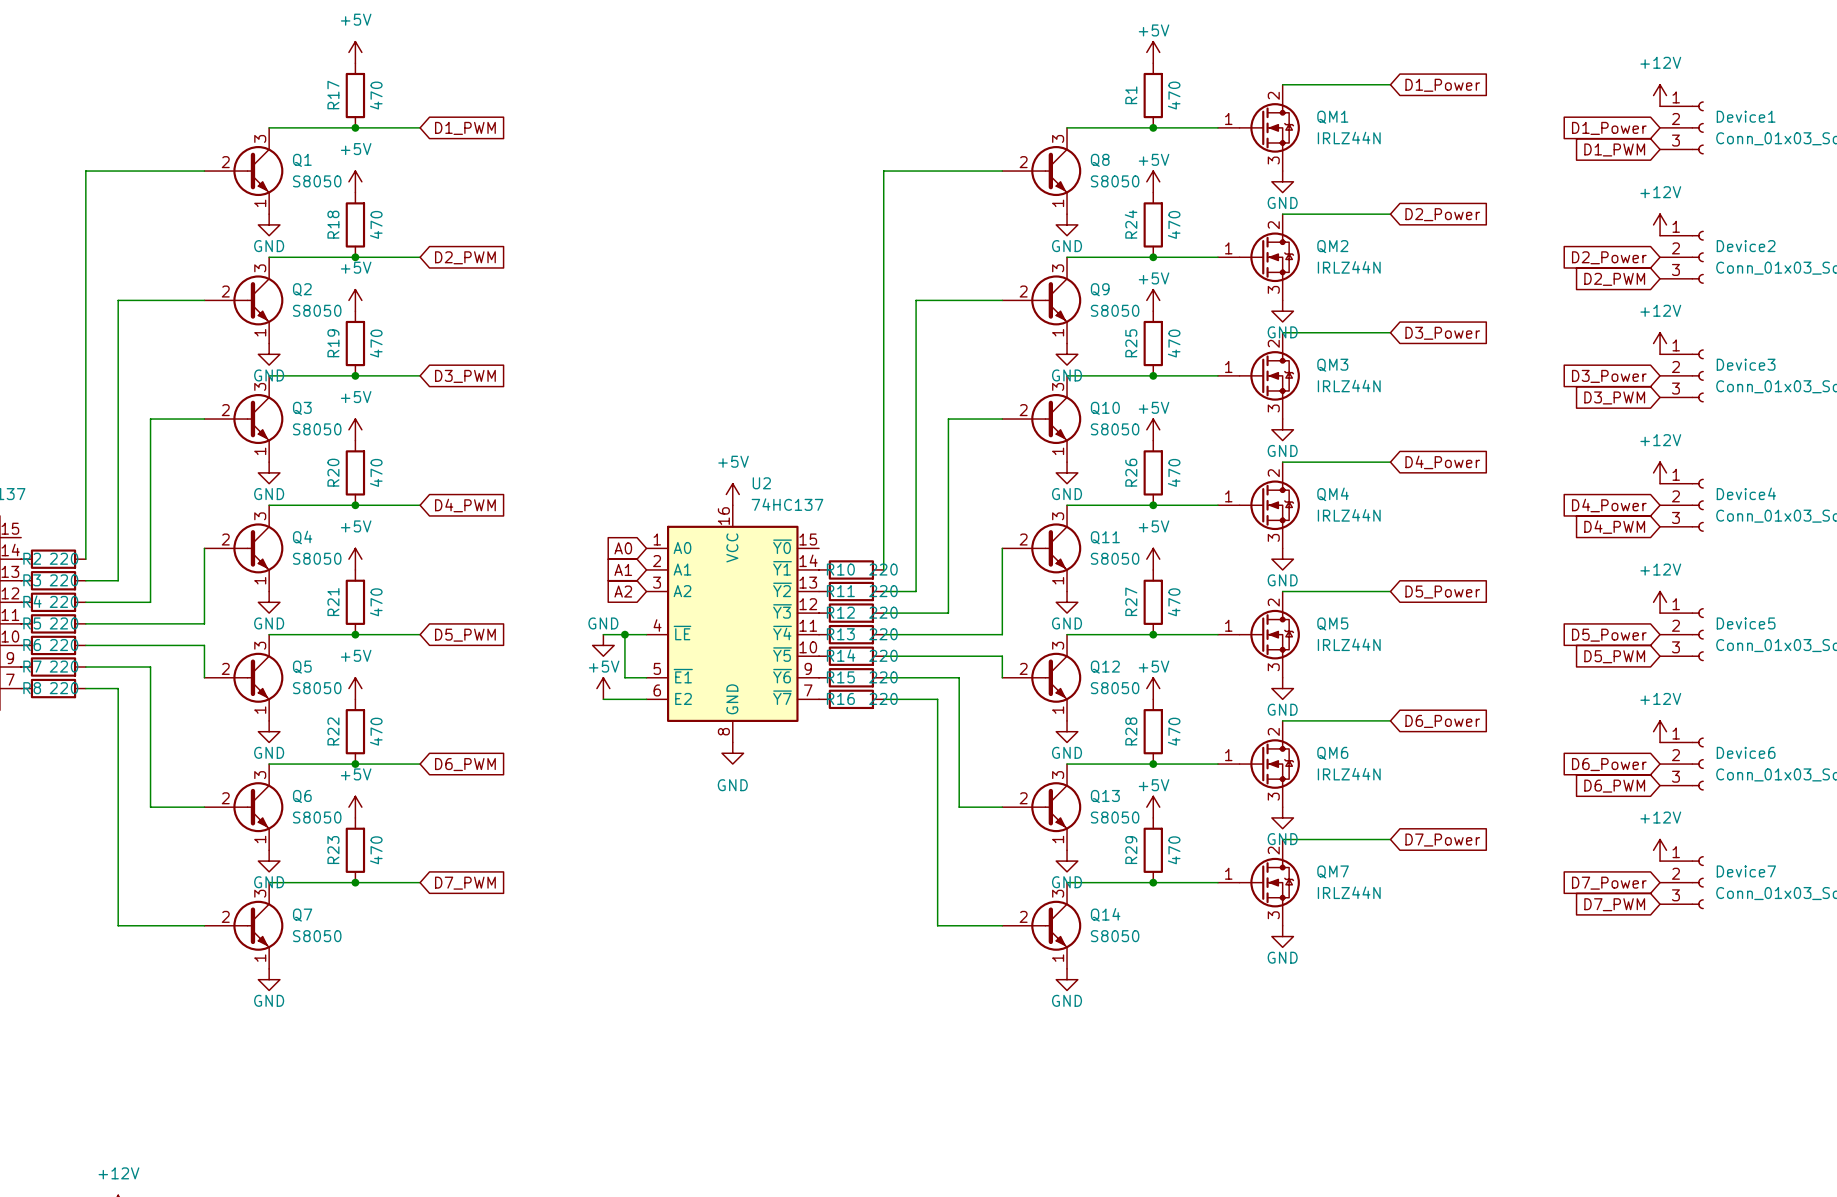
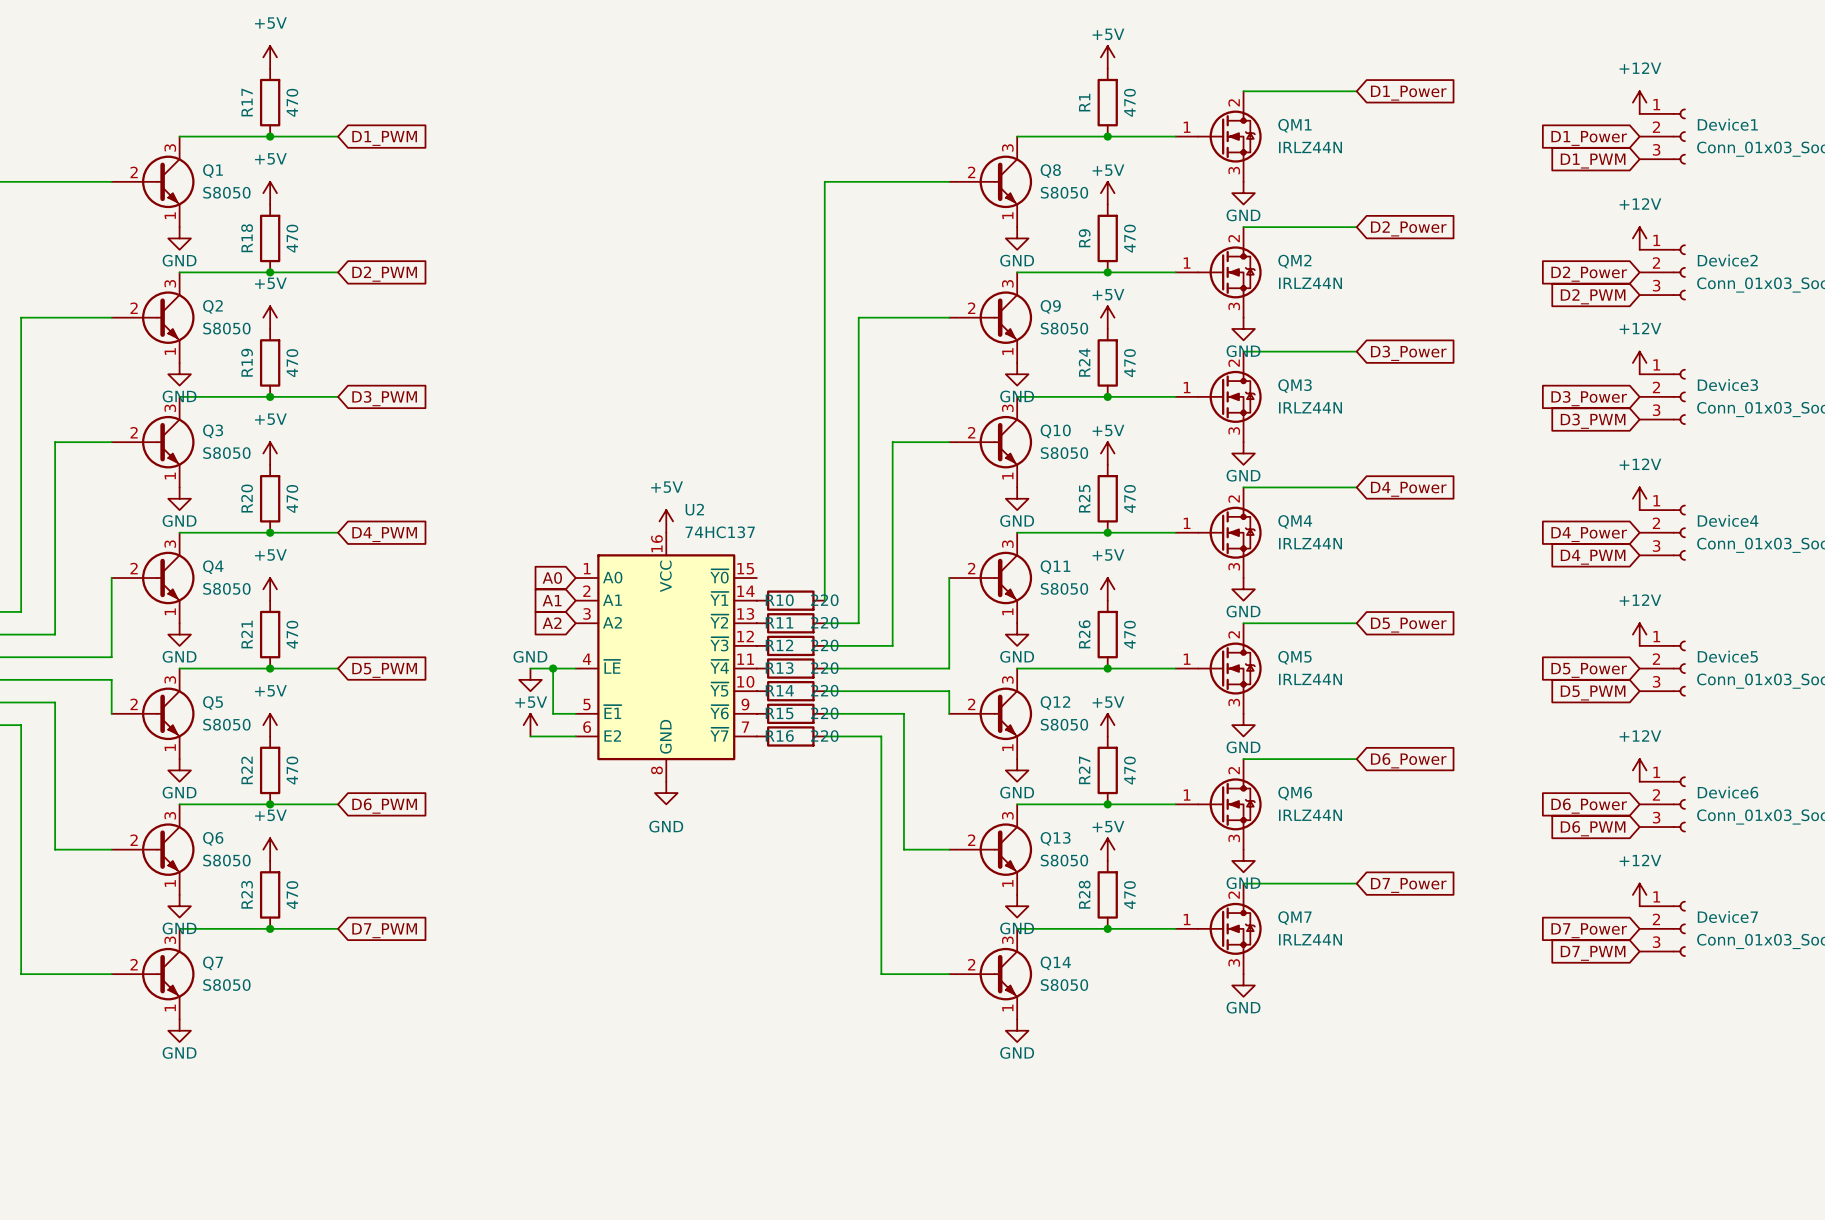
R24 name: R24 (1131, 224) -> R9 (1084, 238)
R25 name: R25 (1131, 343) -> R24 (1084, 362)
R26 name: R26 (1131, 472) -> R25 (1084, 498)
R27 name: R27 (1131, 601) -> R26 (1084, 634)
R28 name: R28 (1131, 731) -> R27 (1084, 770)
R29 name: R29 (1131, 850) -> R28 (1084, 894)

